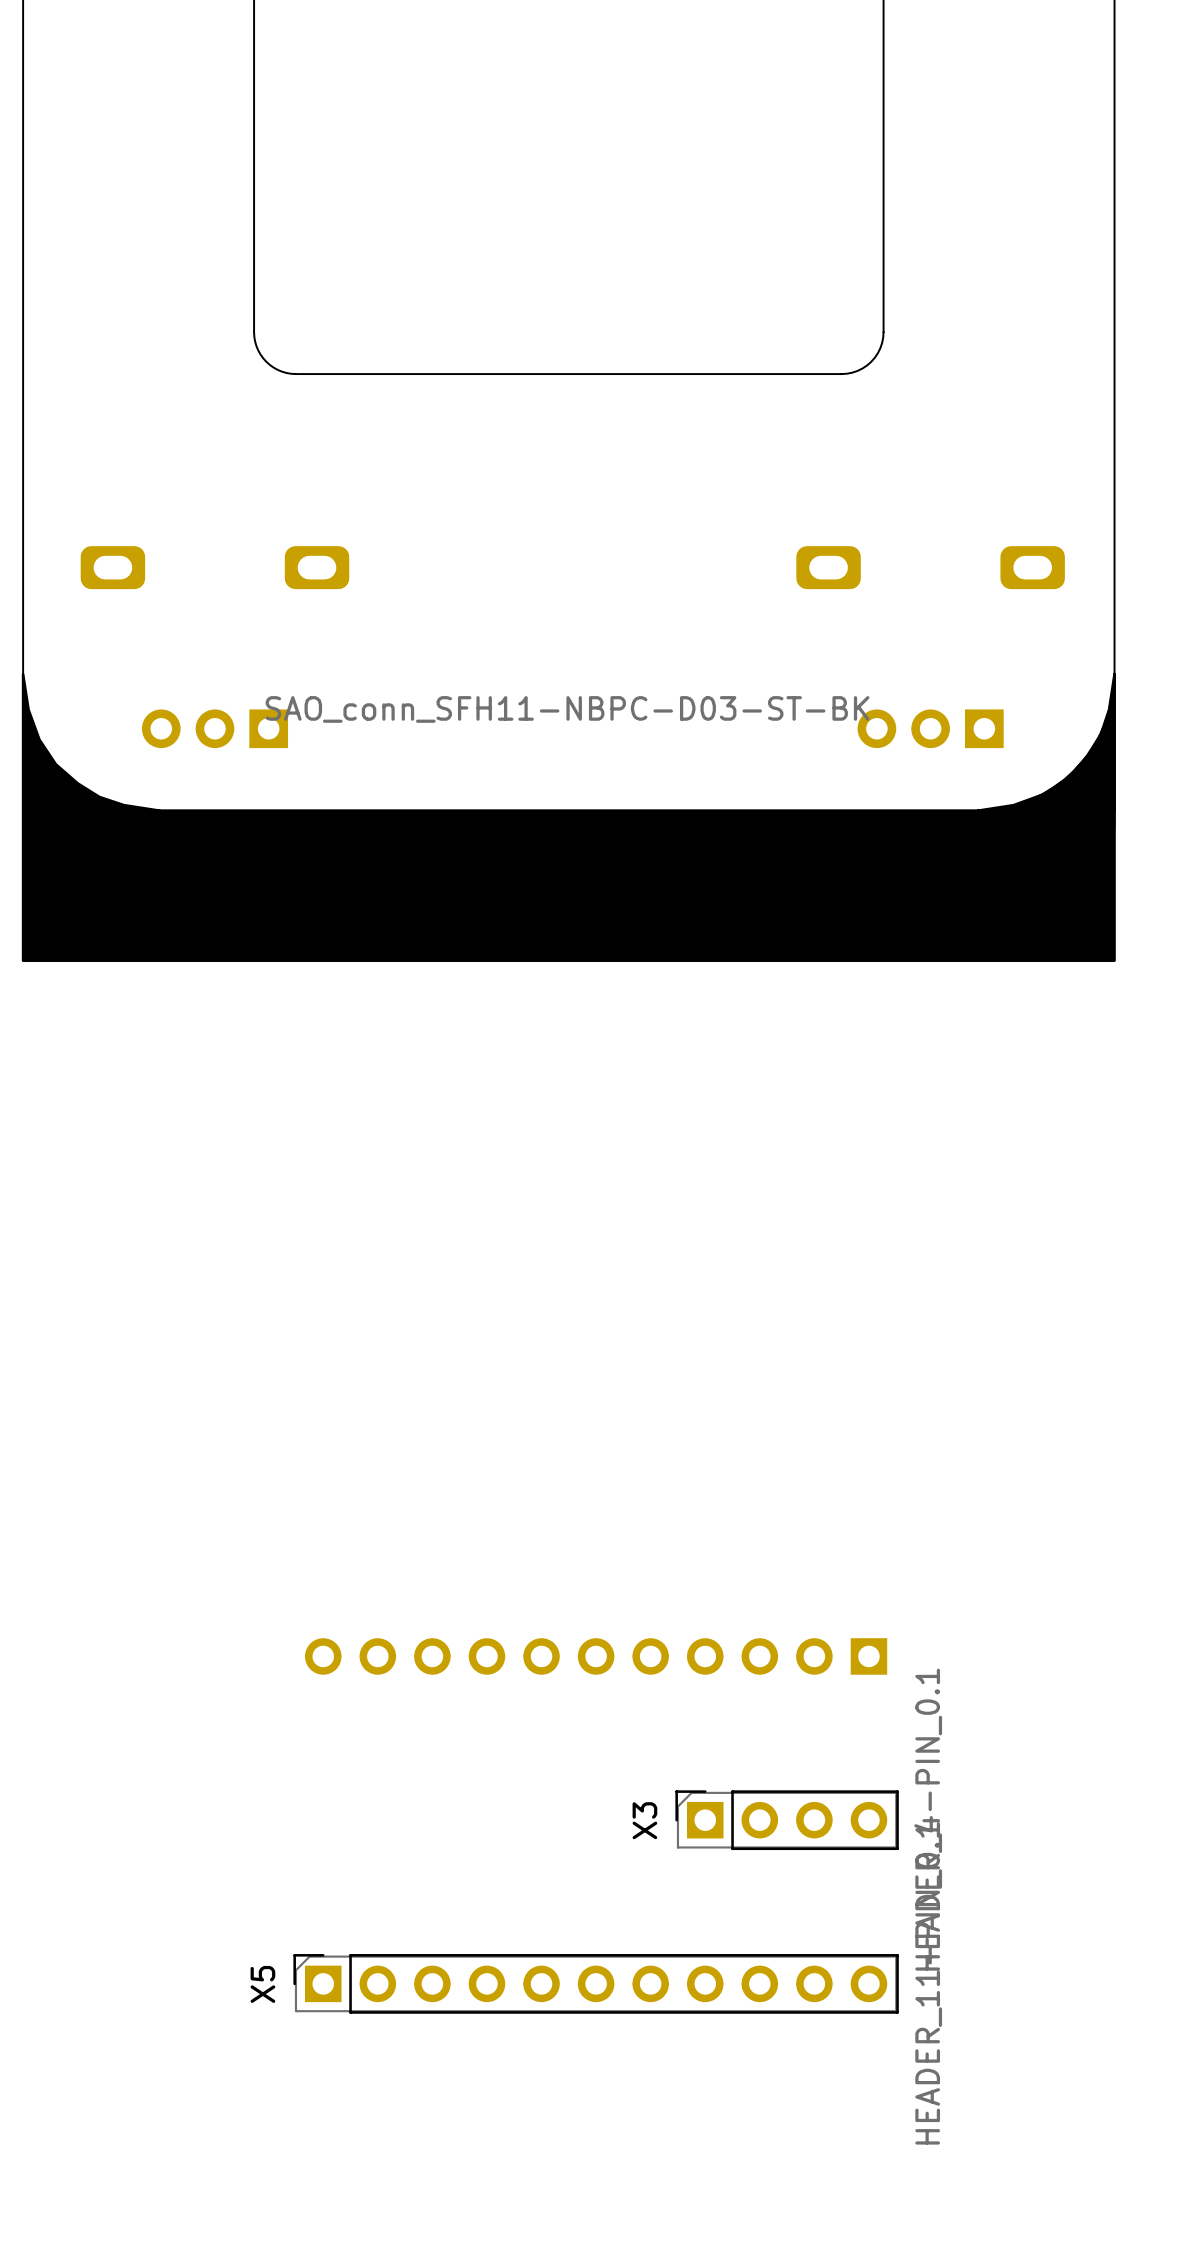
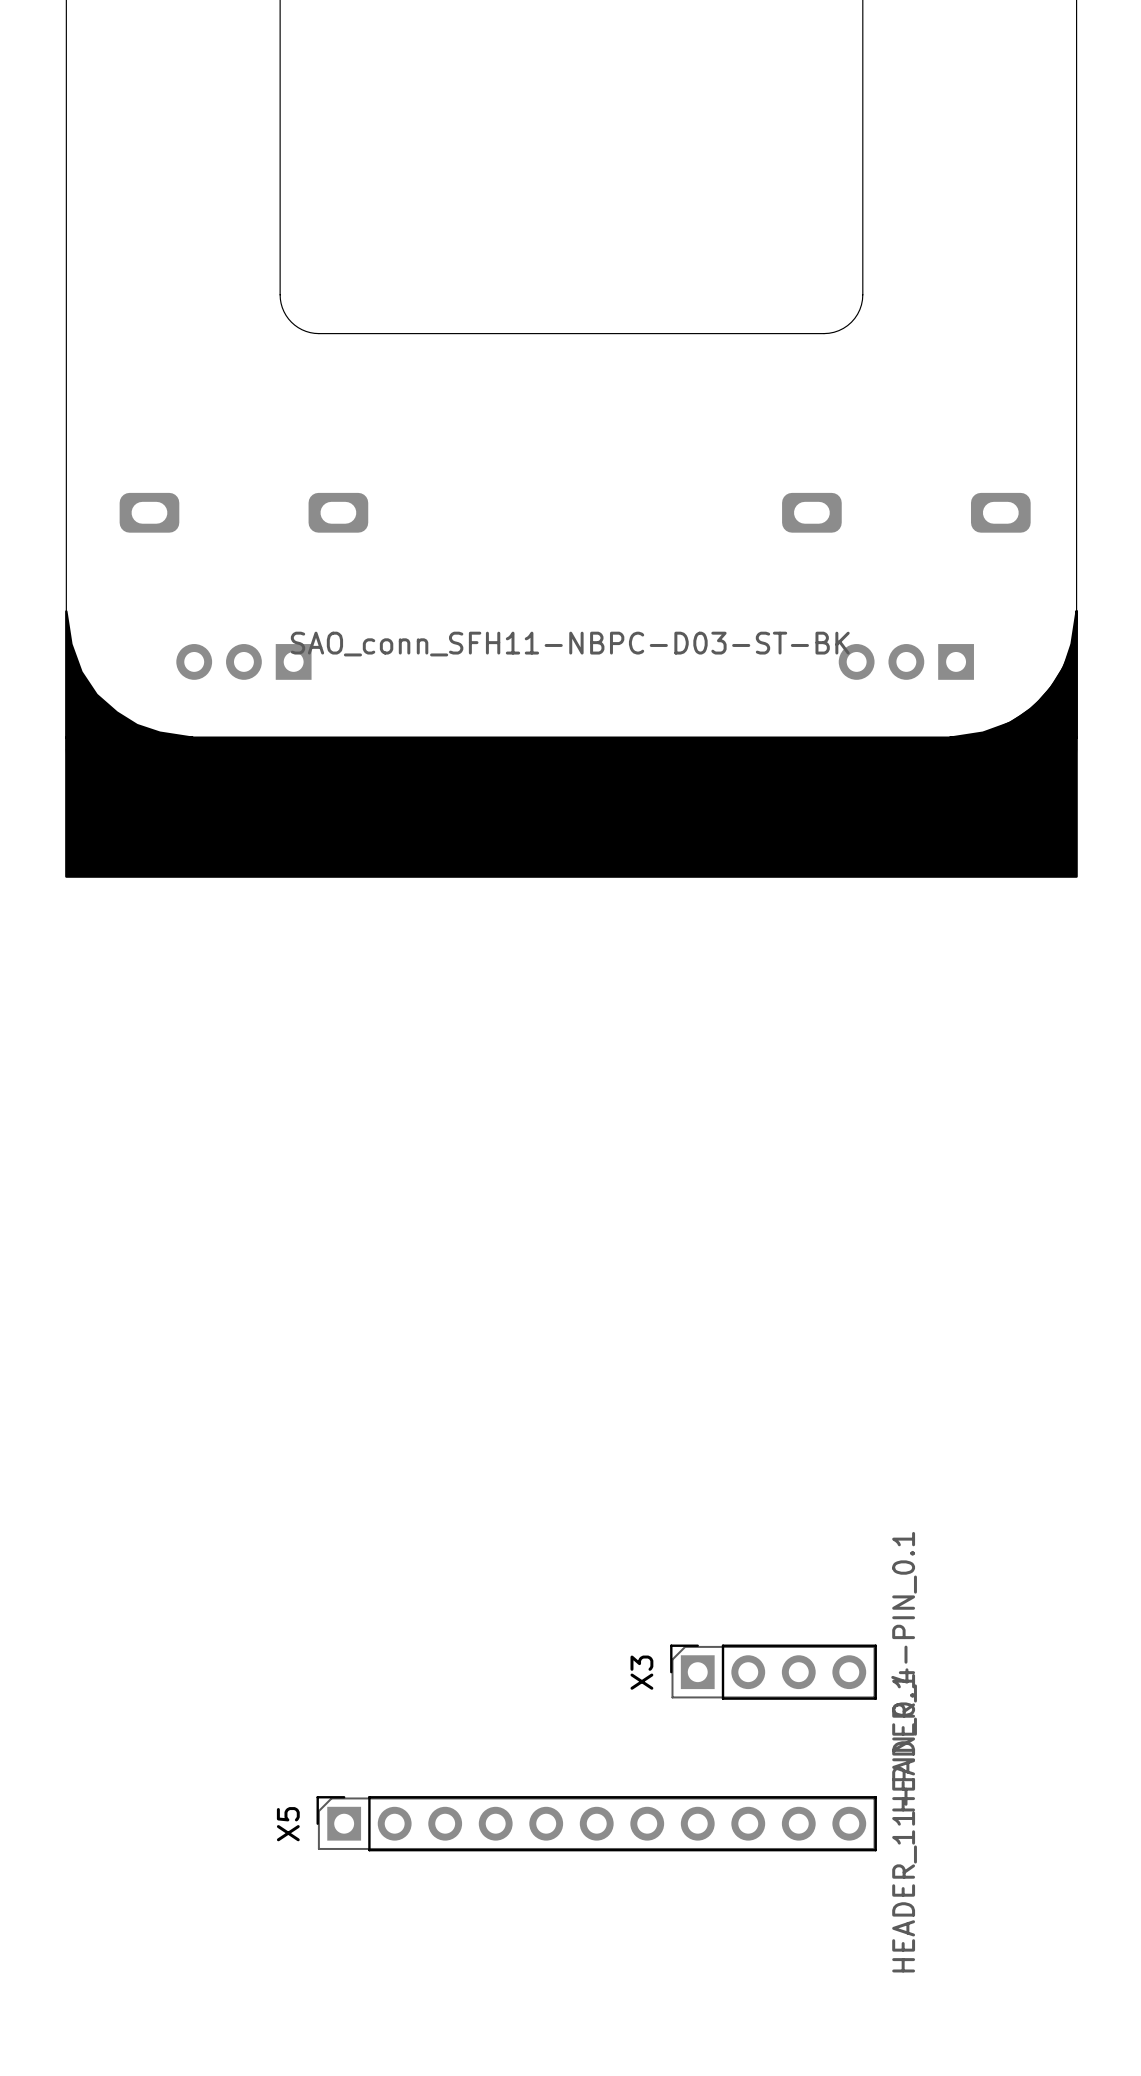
part: (596, 1656) -> none

